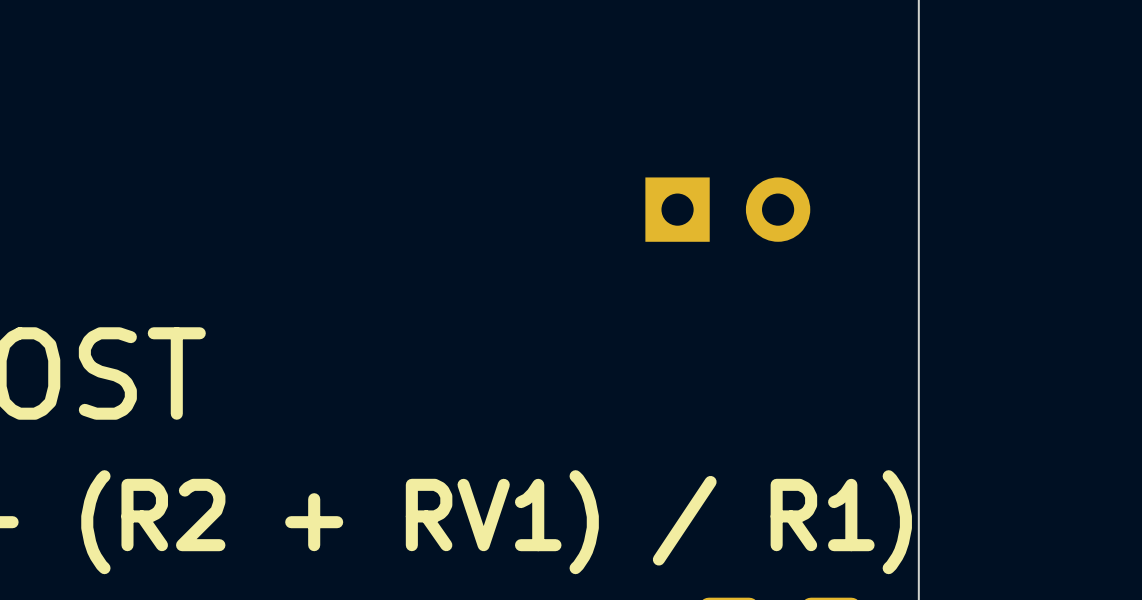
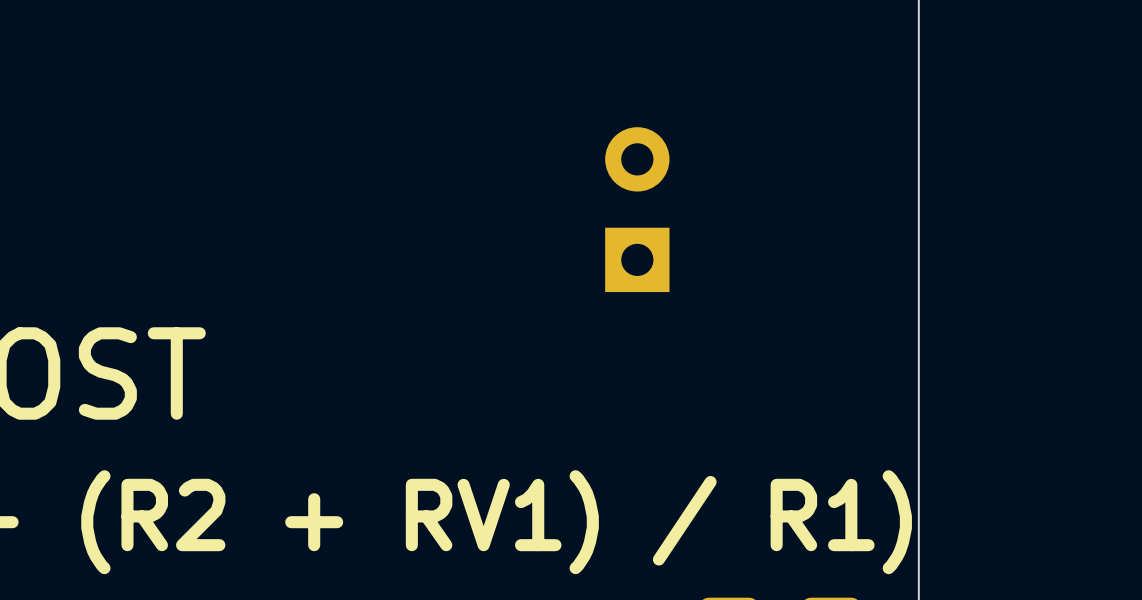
part rotation: 0° (727, 209) -> 90° counterclockwise (637, 209)

